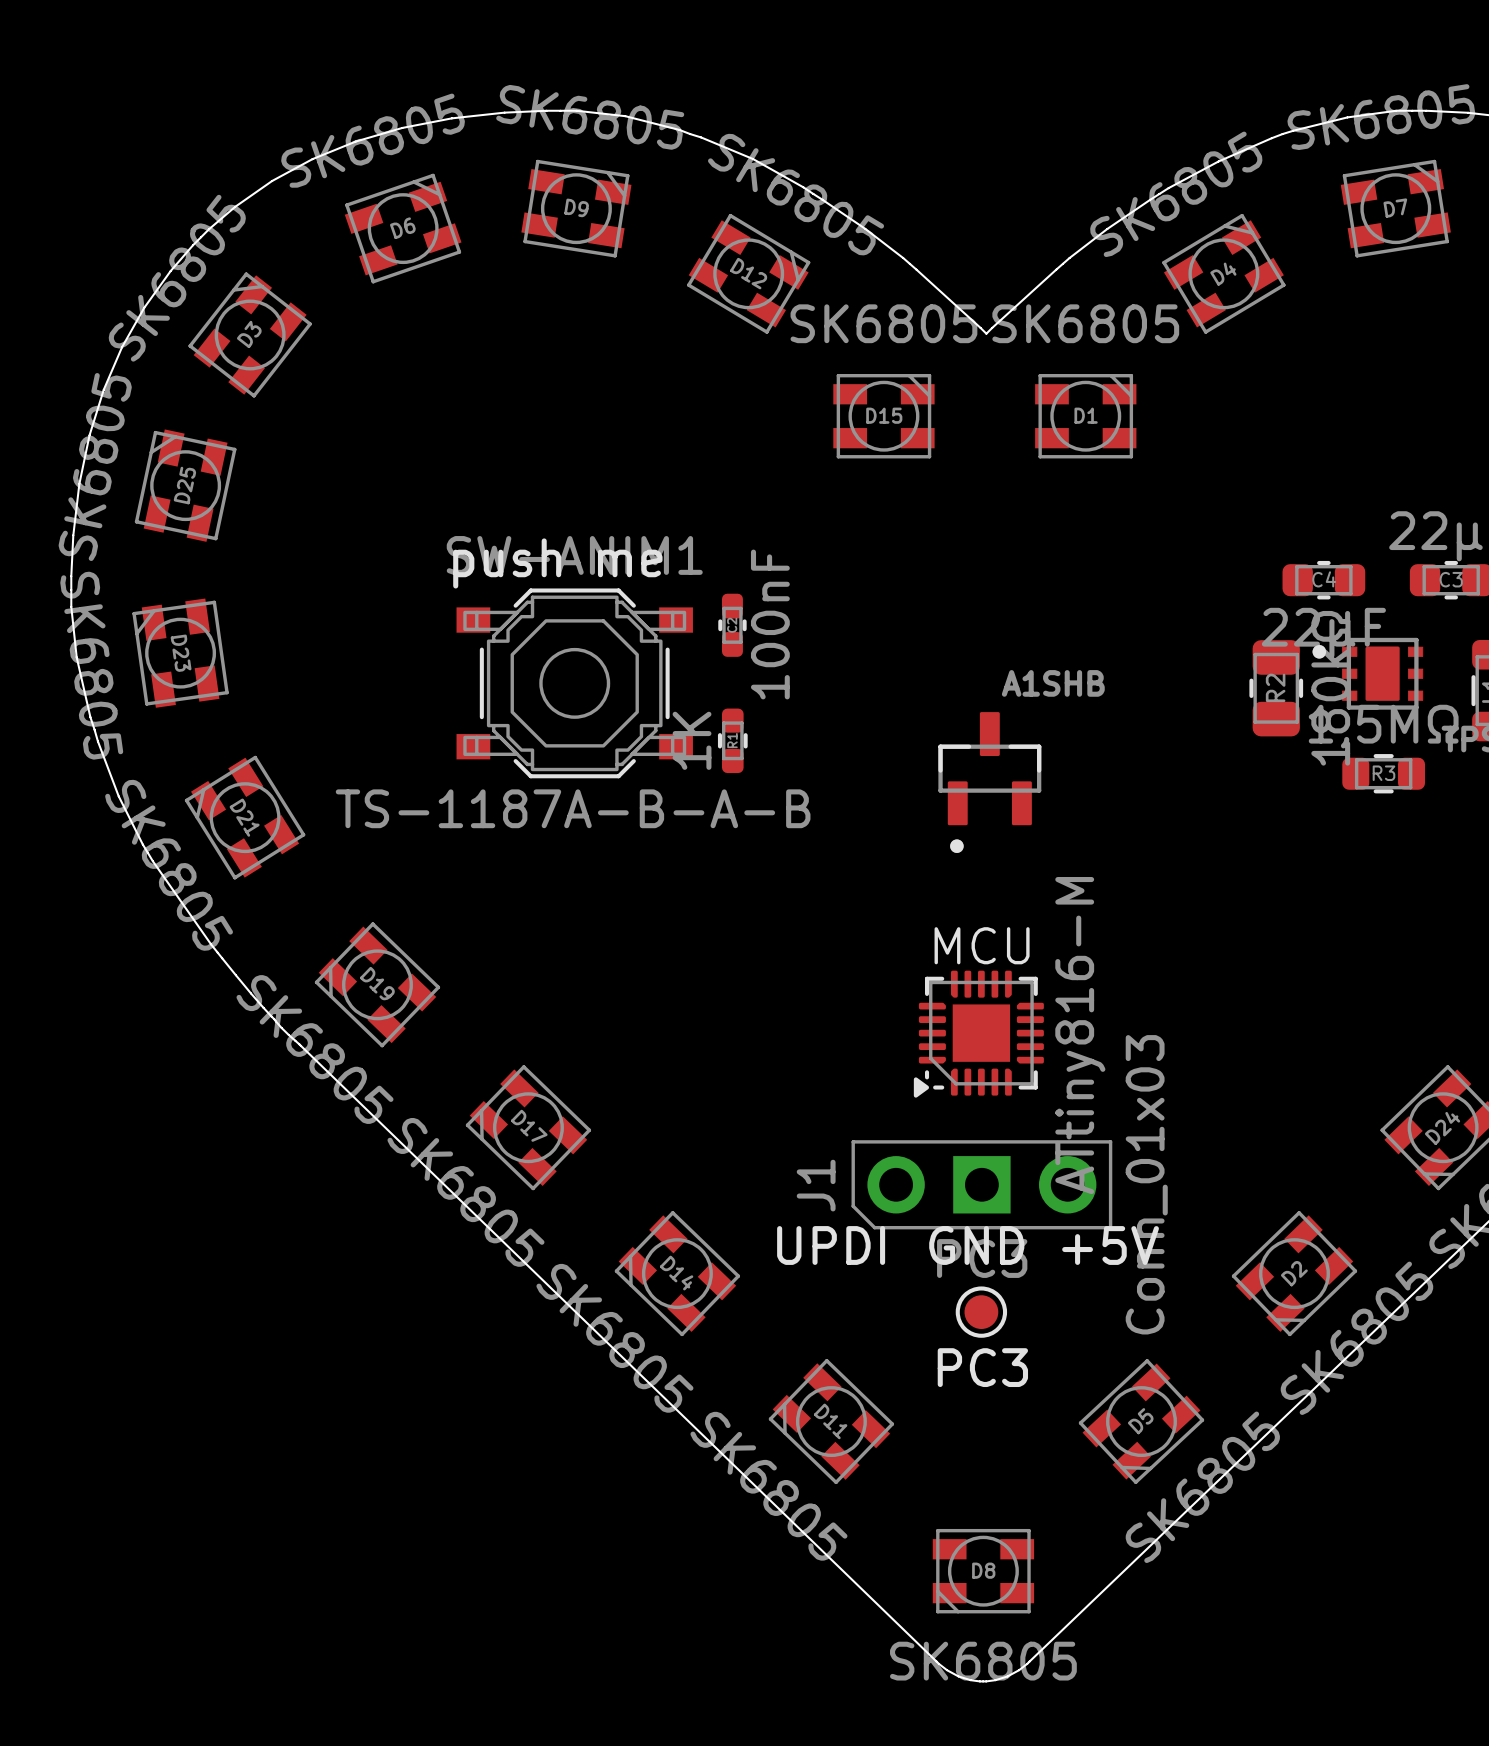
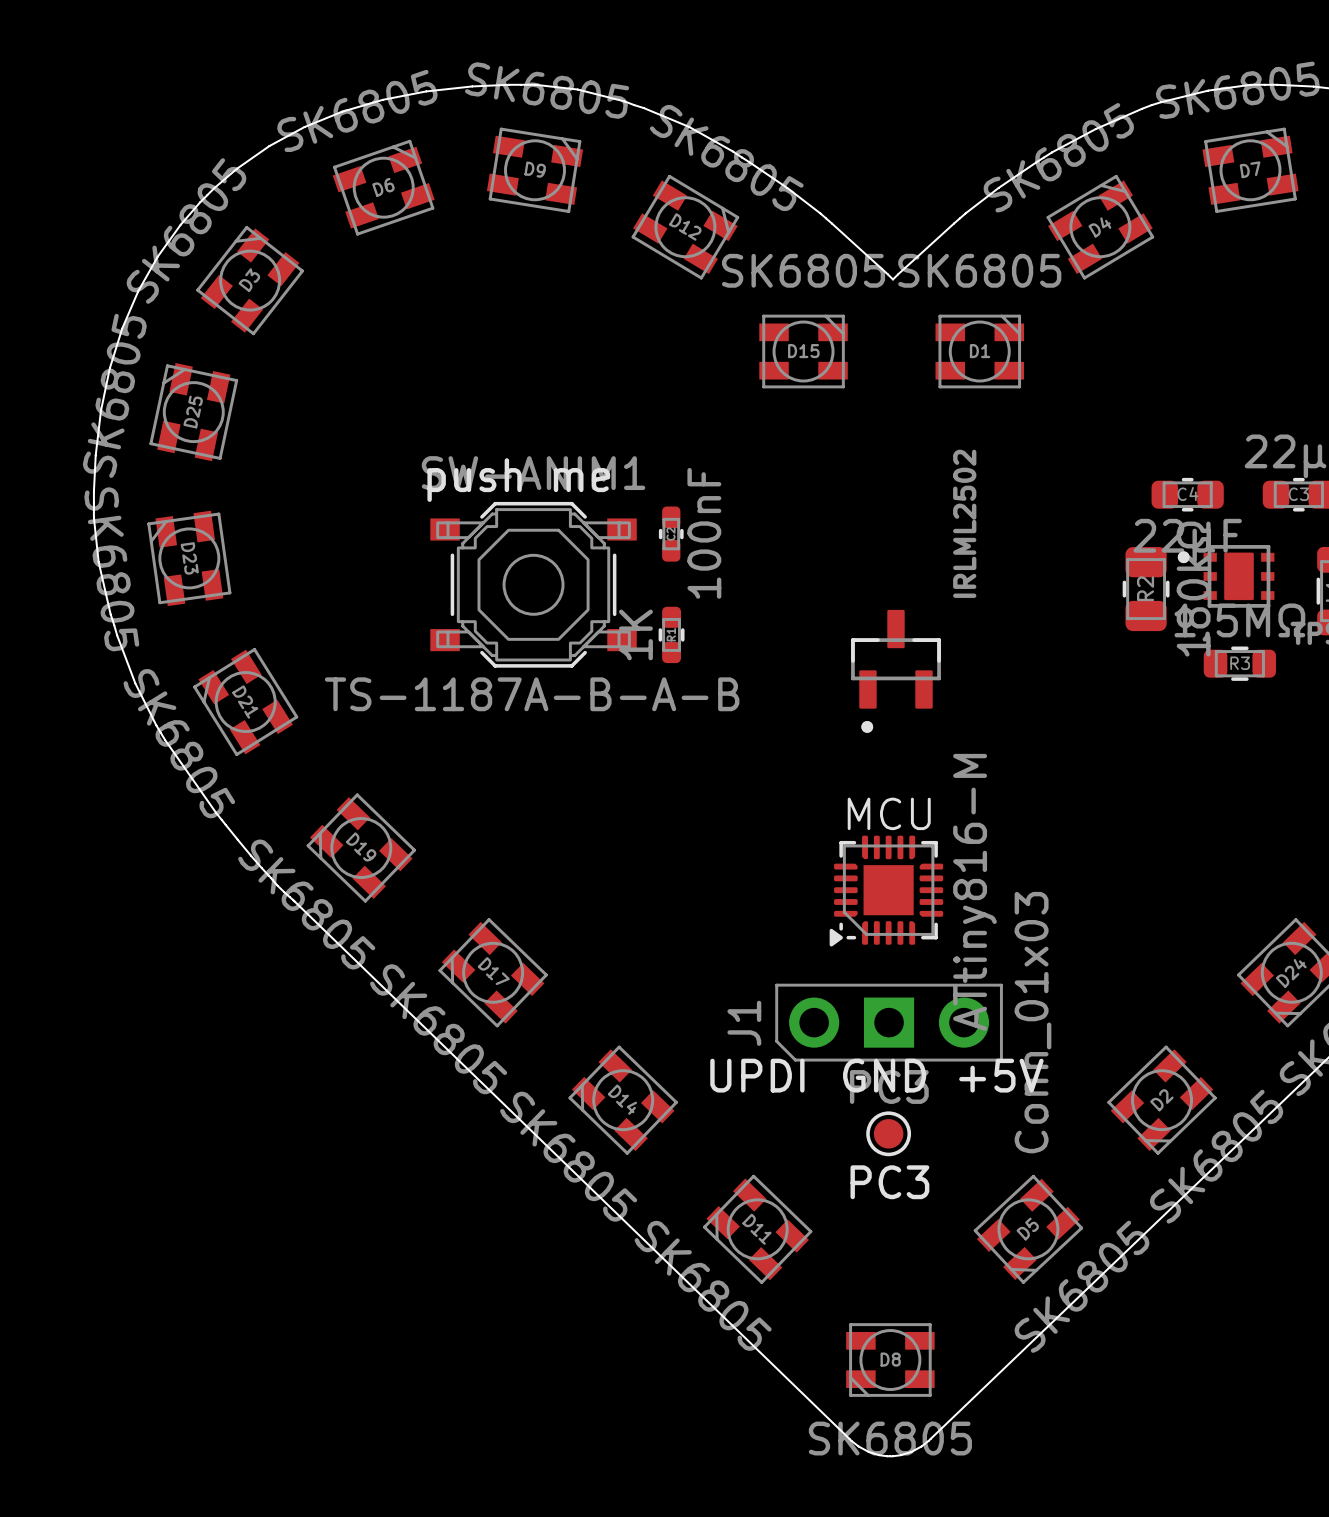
part value: A1SHB (1053, 683) -> IRLML2502 (964, 523)

